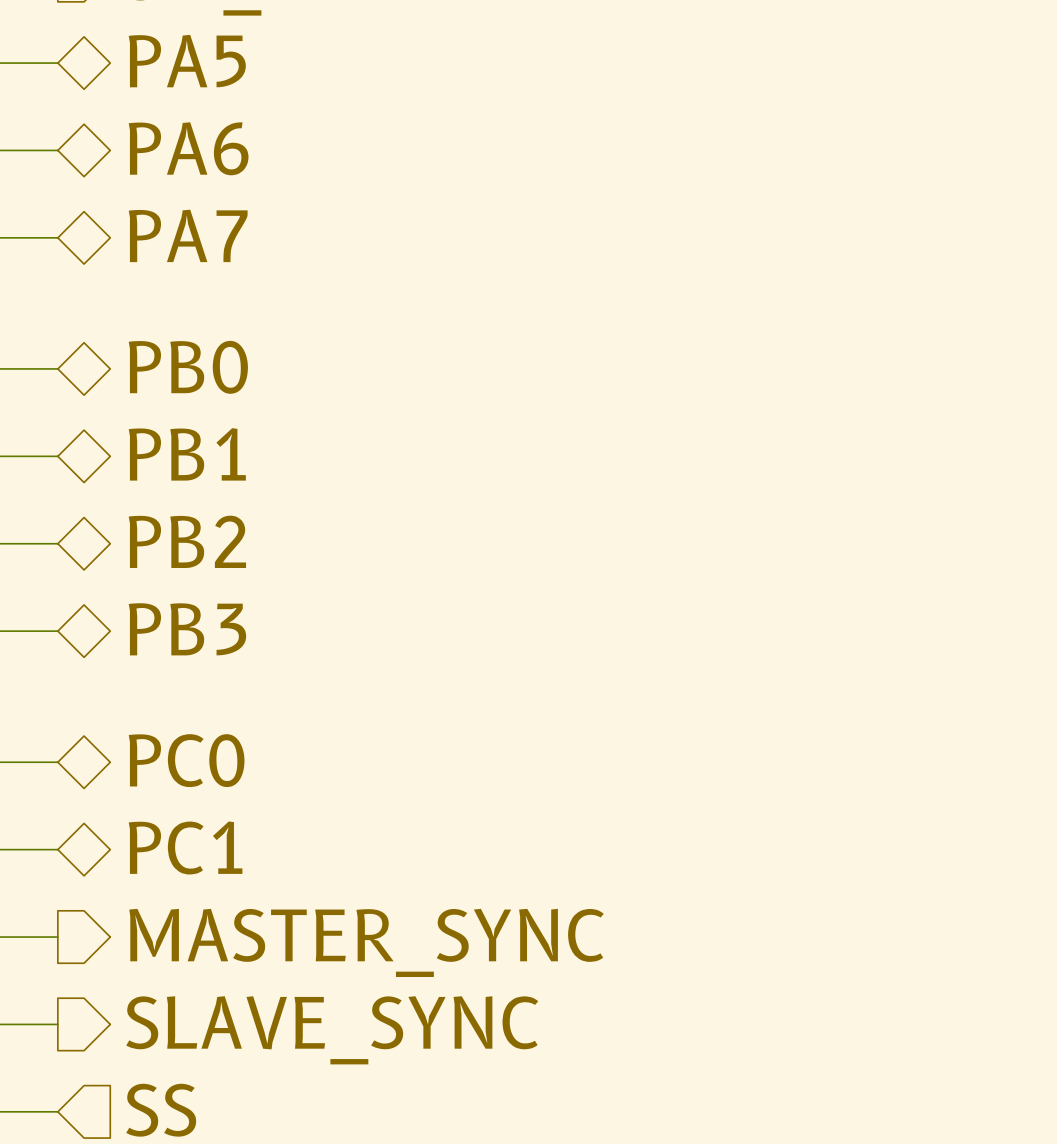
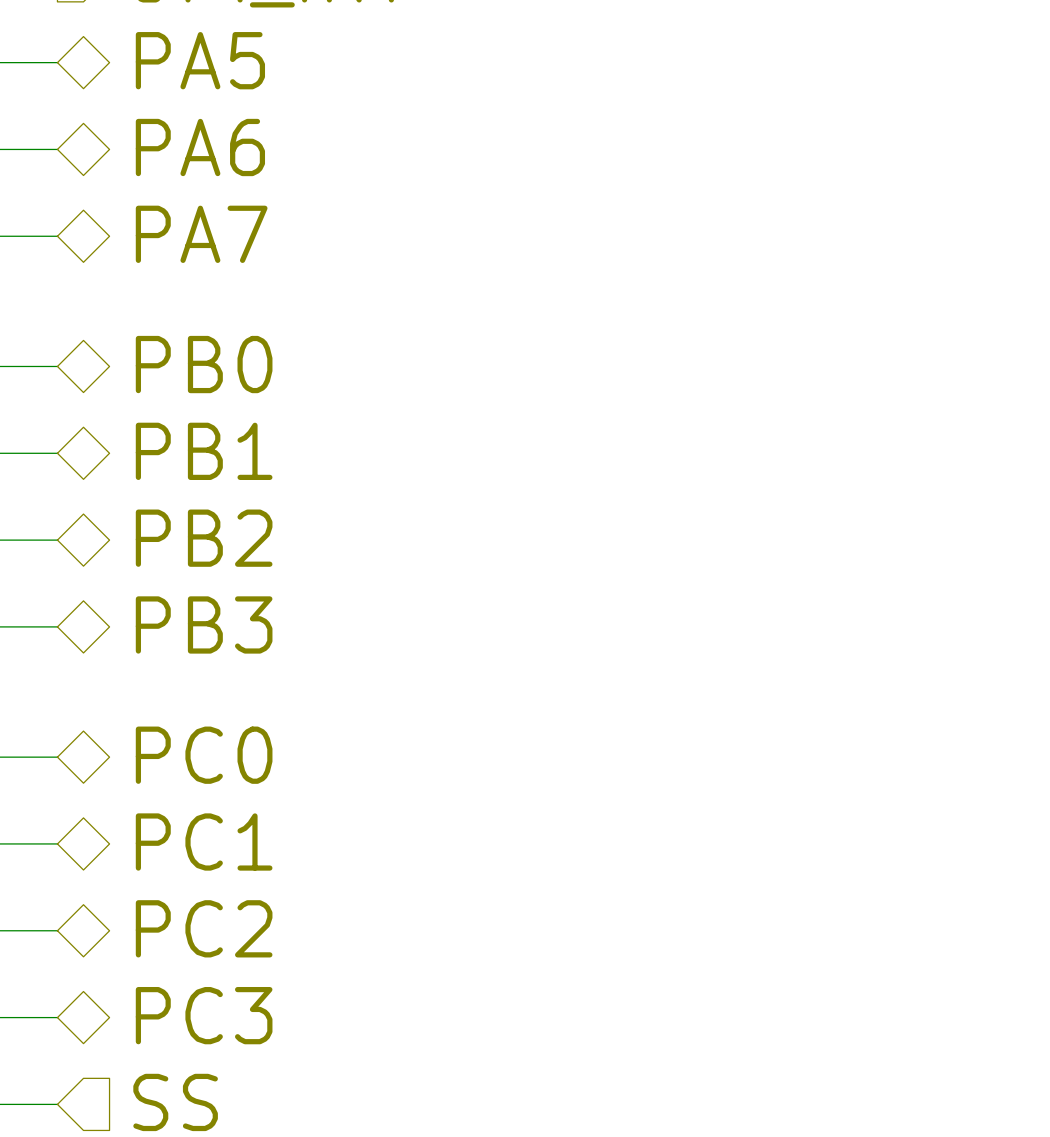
hierarchical label shape: output (366, 942) -> bidirectional (204, 928)
hierarchical label: MASTER_SYNC (366, 942) -> PC2 (204, 928)
hierarchical label shape: output (332, 1030) -> bidirectional (204, 1015)
hierarchical label: SLAVE_SYNC (332, 1030) -> PC3 (204, 1015)

